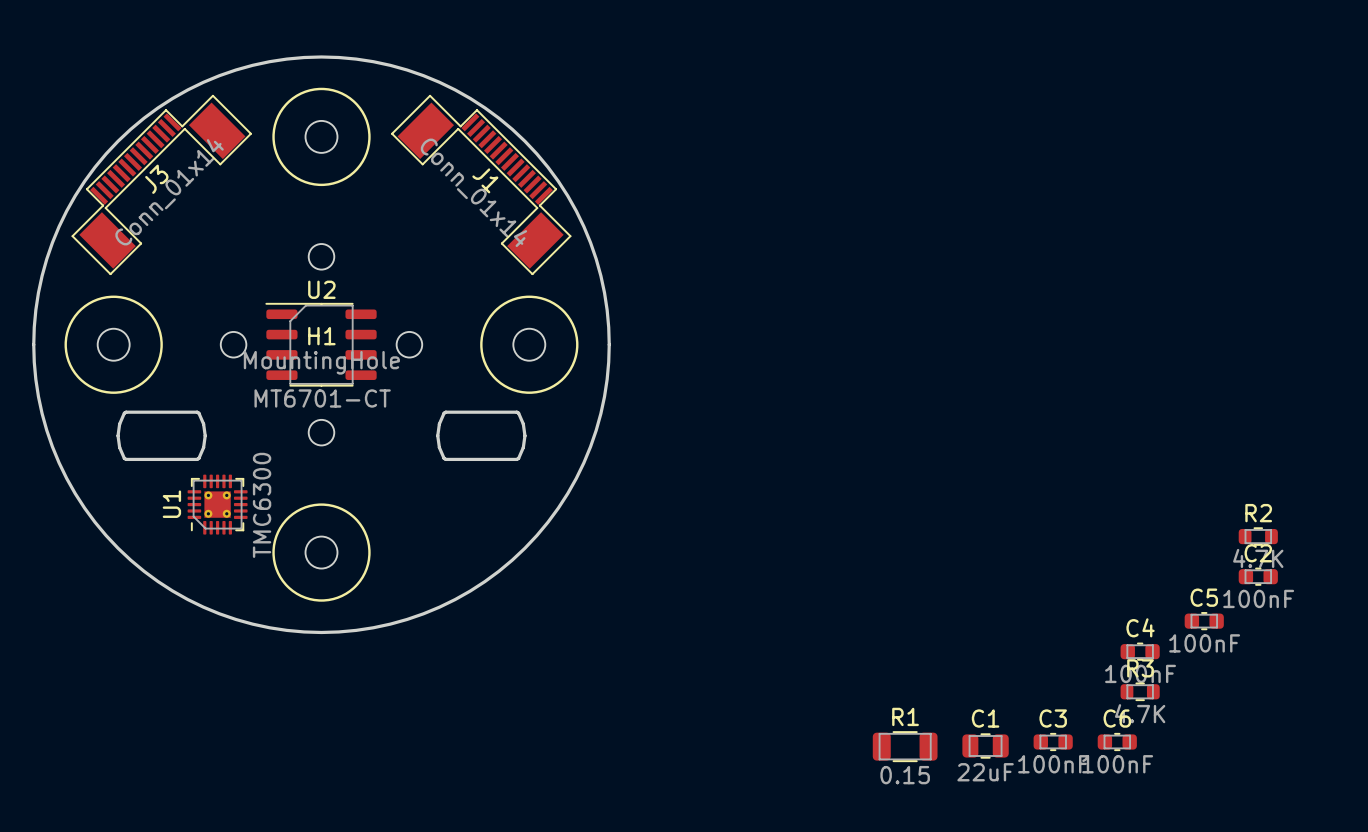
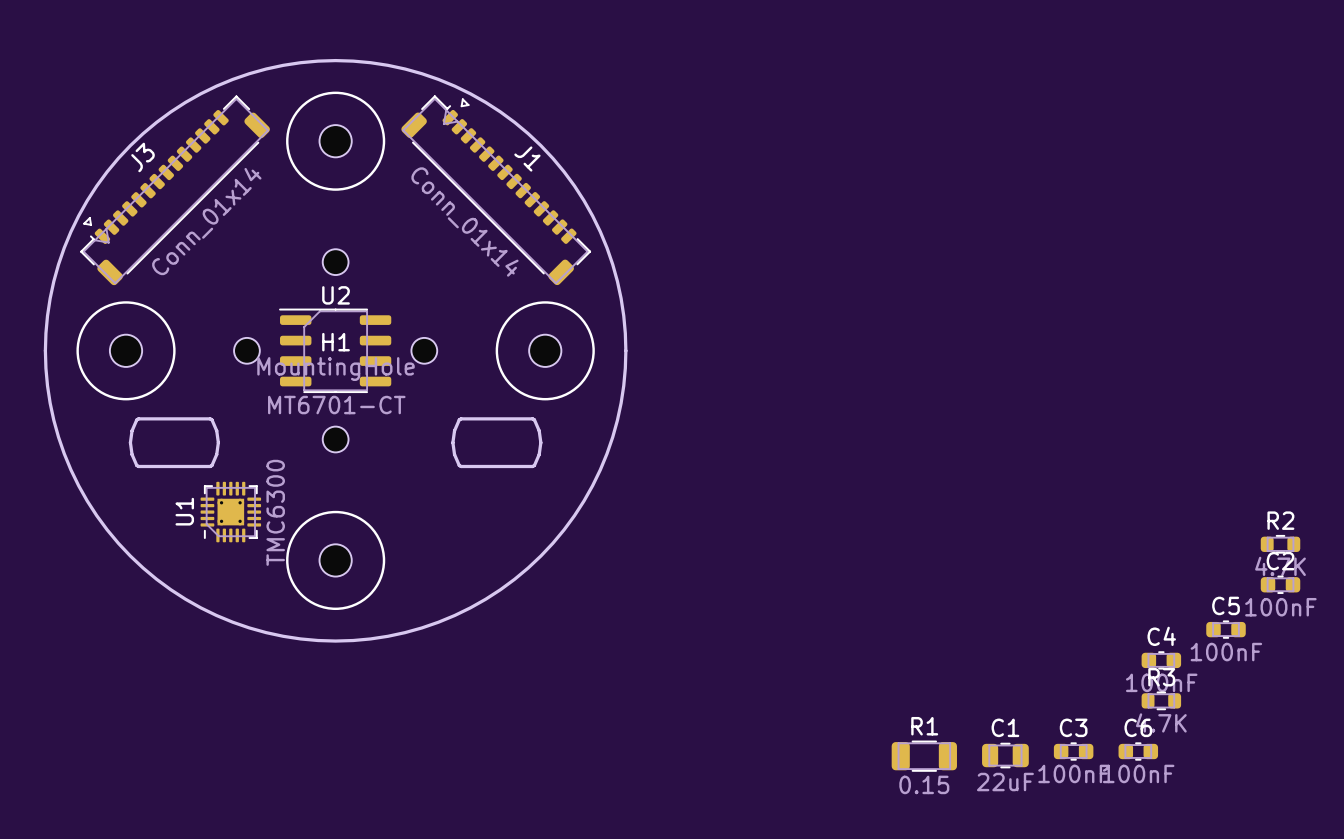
J3 footprint: [71, 94, 252, 276] -> [80, 95, 270, 286]
J1 footprint: [391, 94, 572, 276] -> [401, 95, 592, 286]
J3 name position: J3 (156, 179) -> J3 (143, 157)
J1 name position: J1 (485, 180) -> J1 (527, 159)
J3 value position: Conn_01x14 (169, 192) -> Conn_01x14 (206, 221)
J1 value position: Conn_01x14 (473, 192) -> Conn_01x14 (464, 222)

